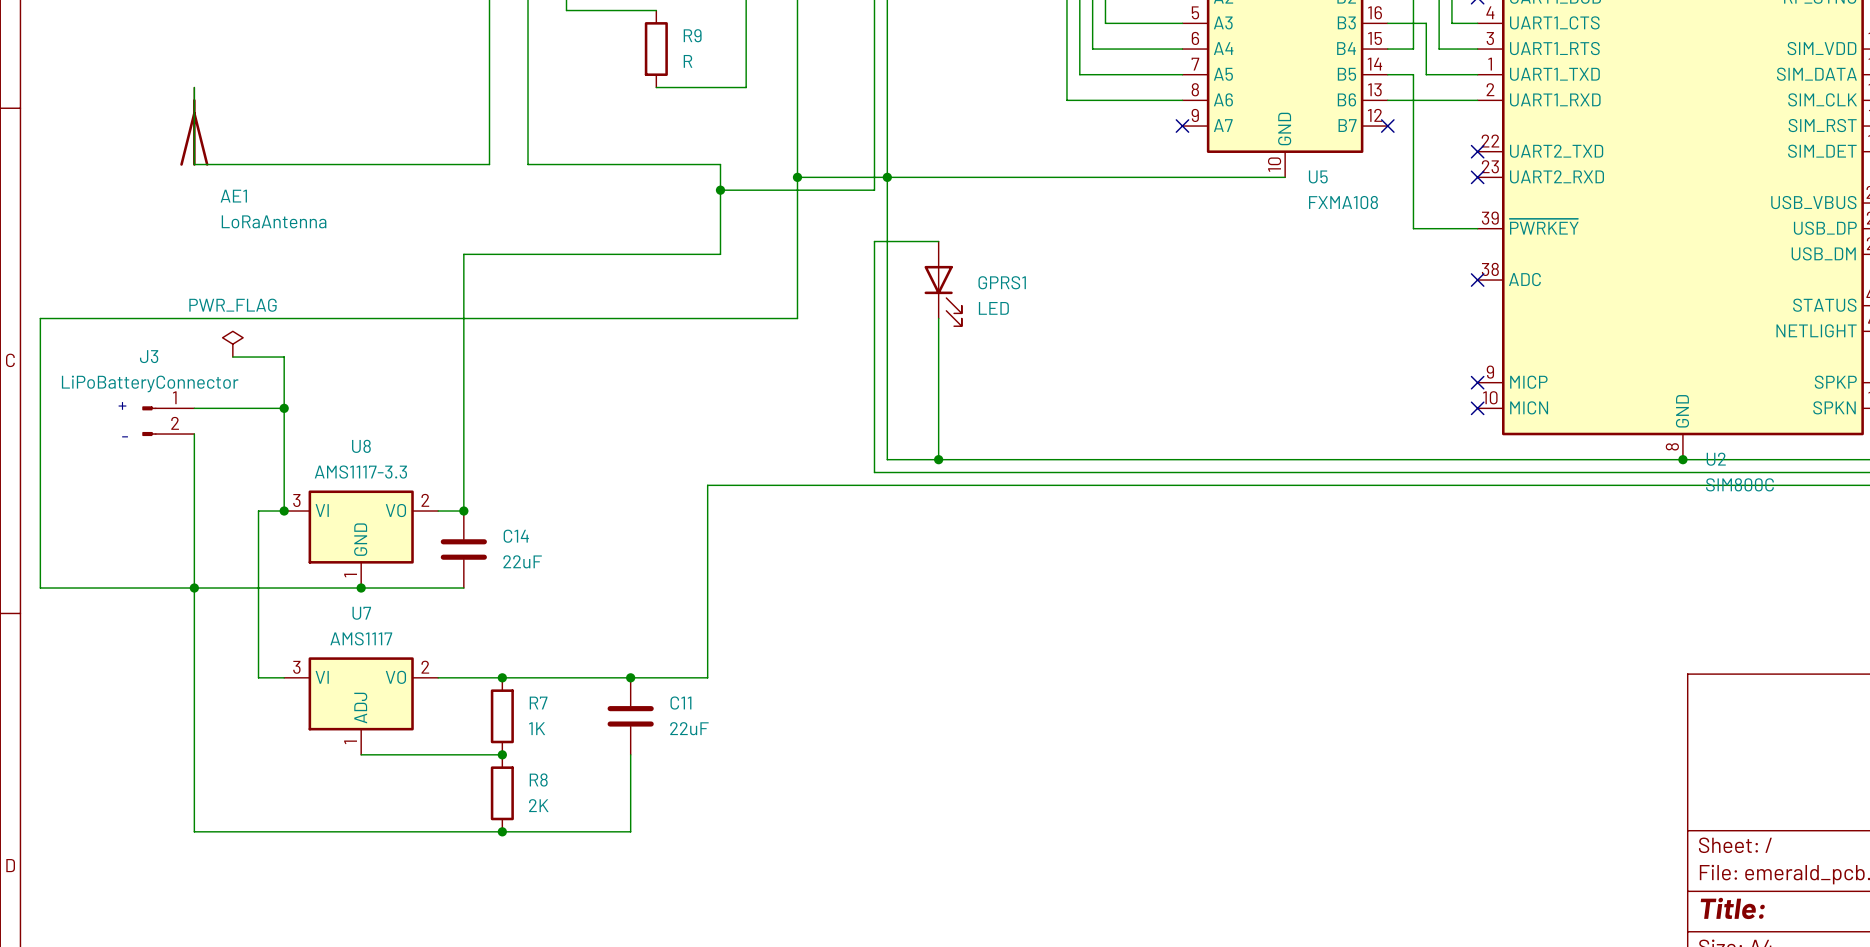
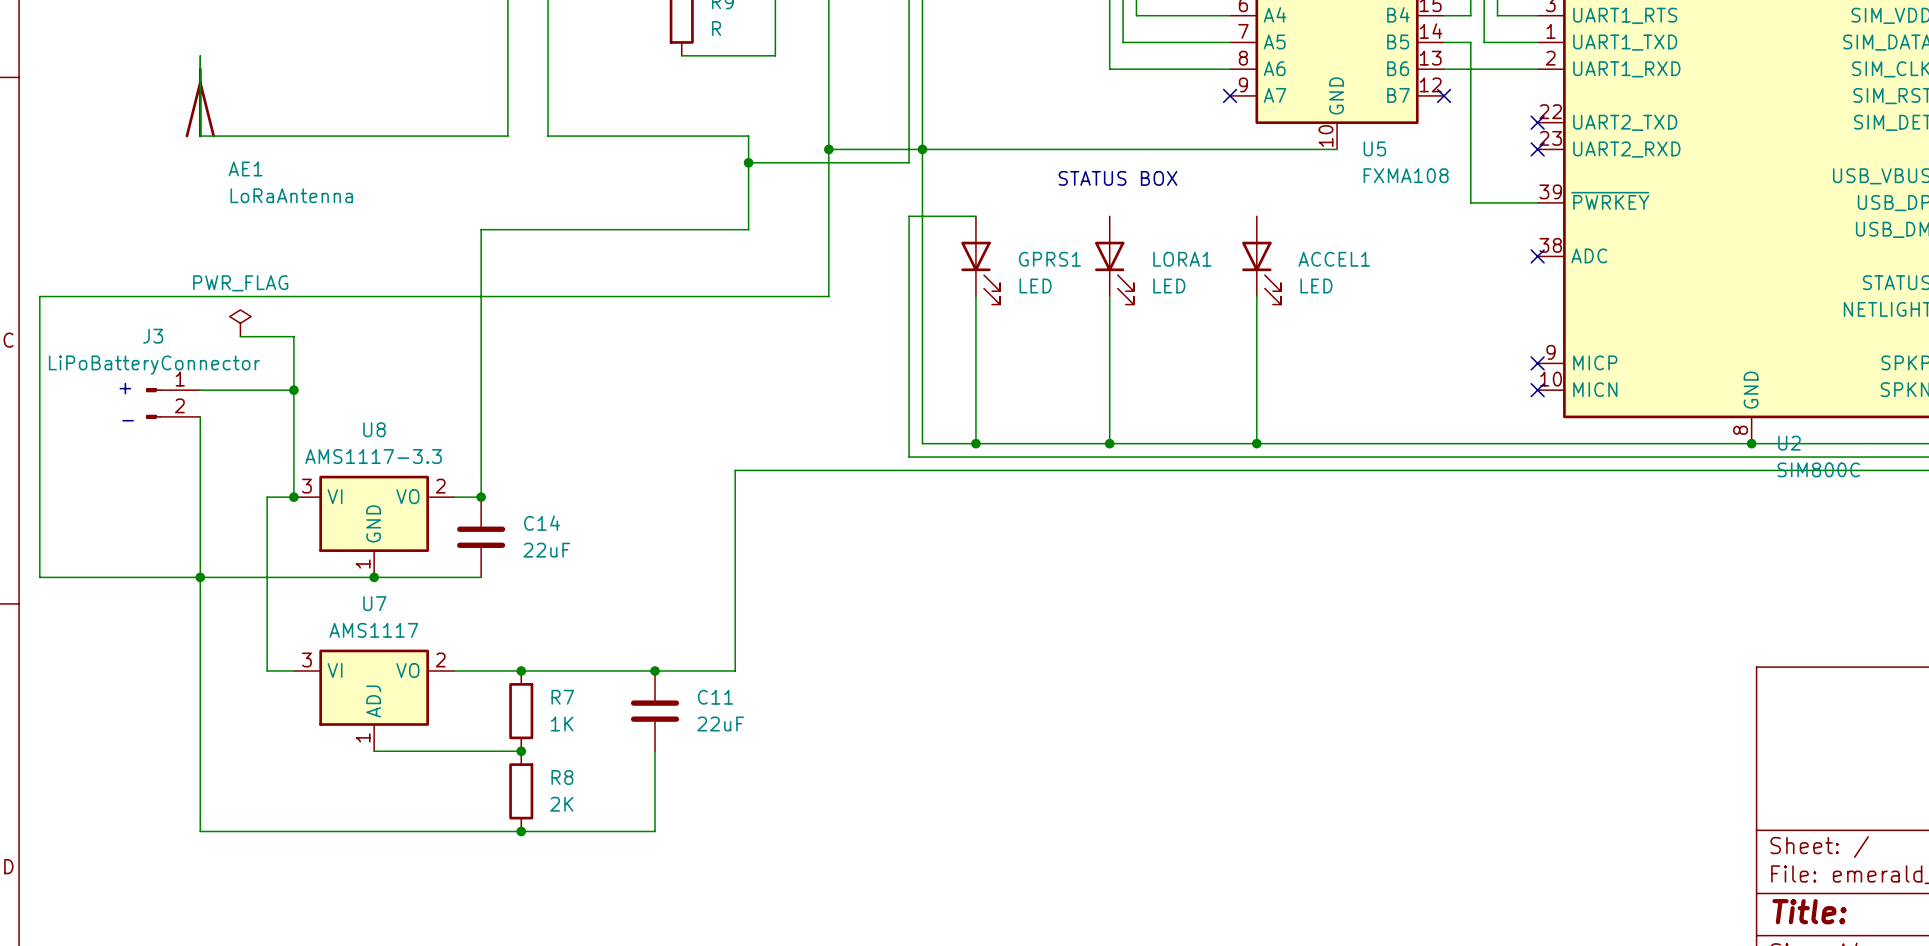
text: none -> STATUS BOX (1118, 178)
LORA1: none -> LED (1114, 260)
ACCEL1: none -> LED (1261, 260)
wire: none -> (1109, 296) (1109, 443)
wire: none -> (1256, 296) (1256, 443)
junction: none -> (1109, 443)
junction: none -> (1256, 443)

